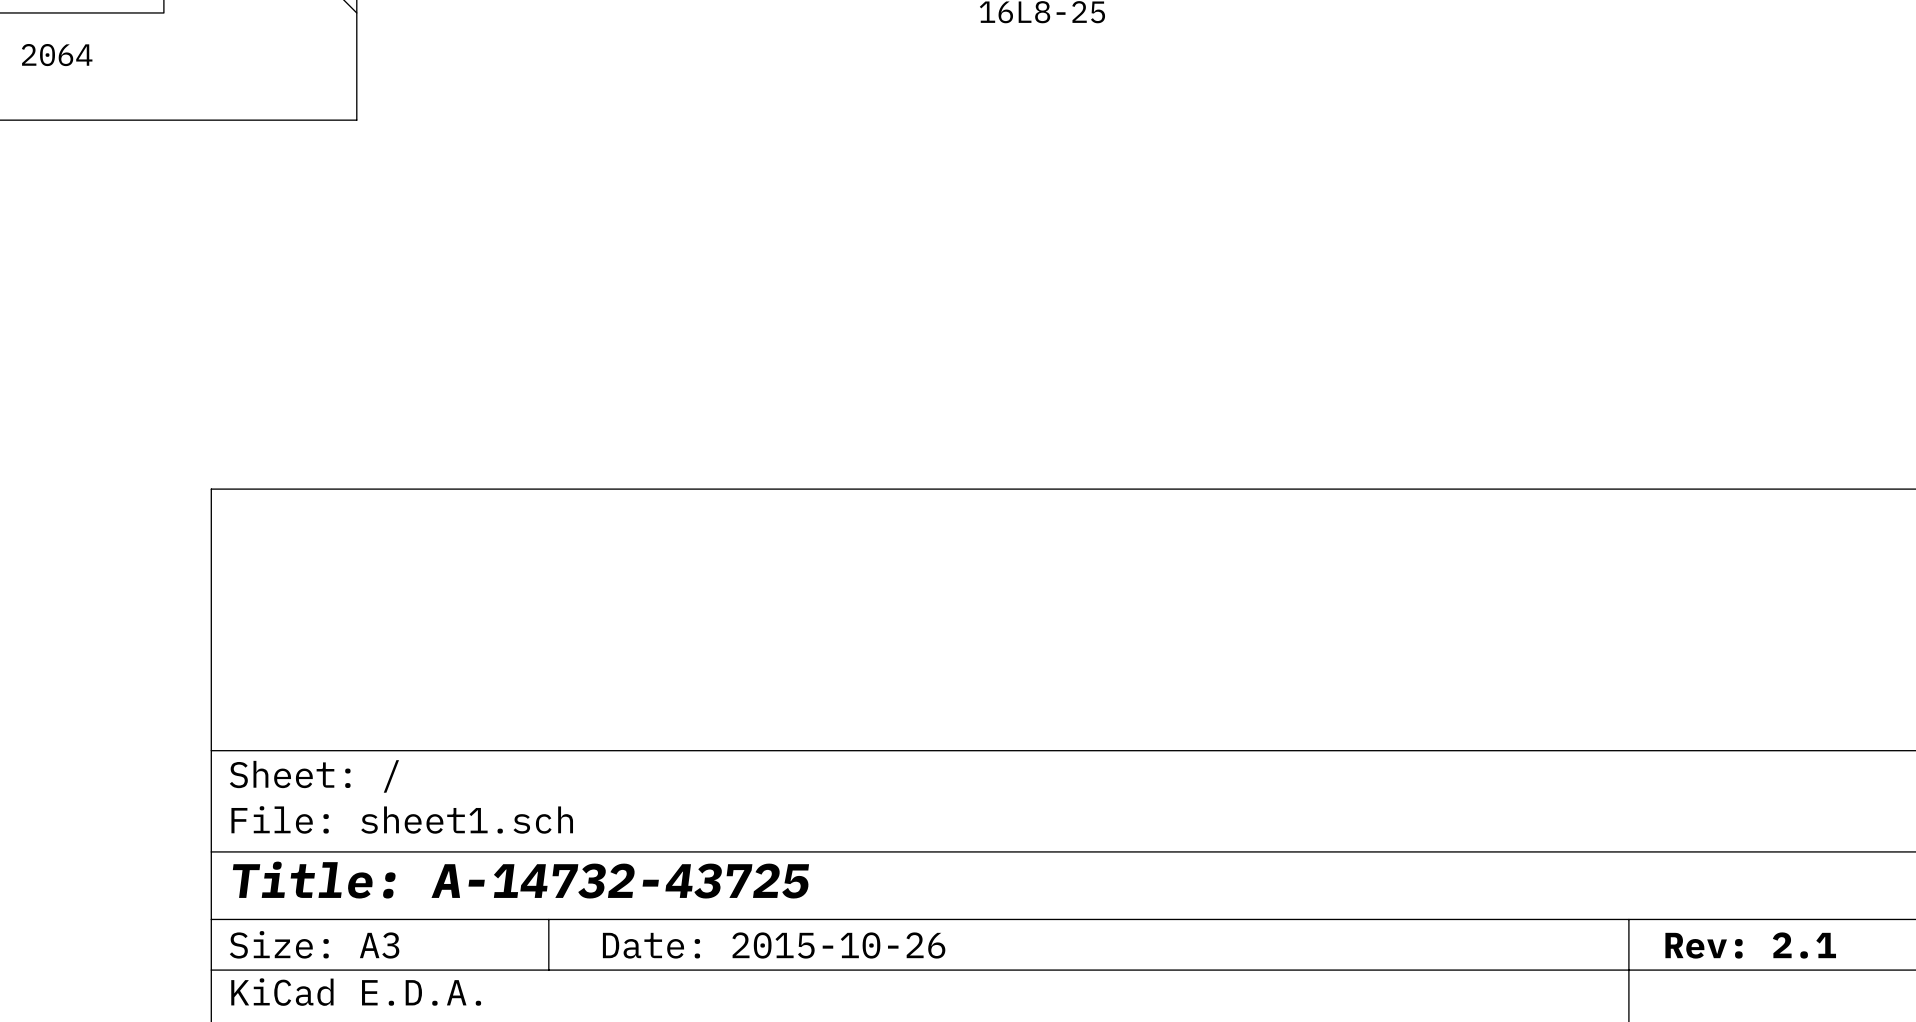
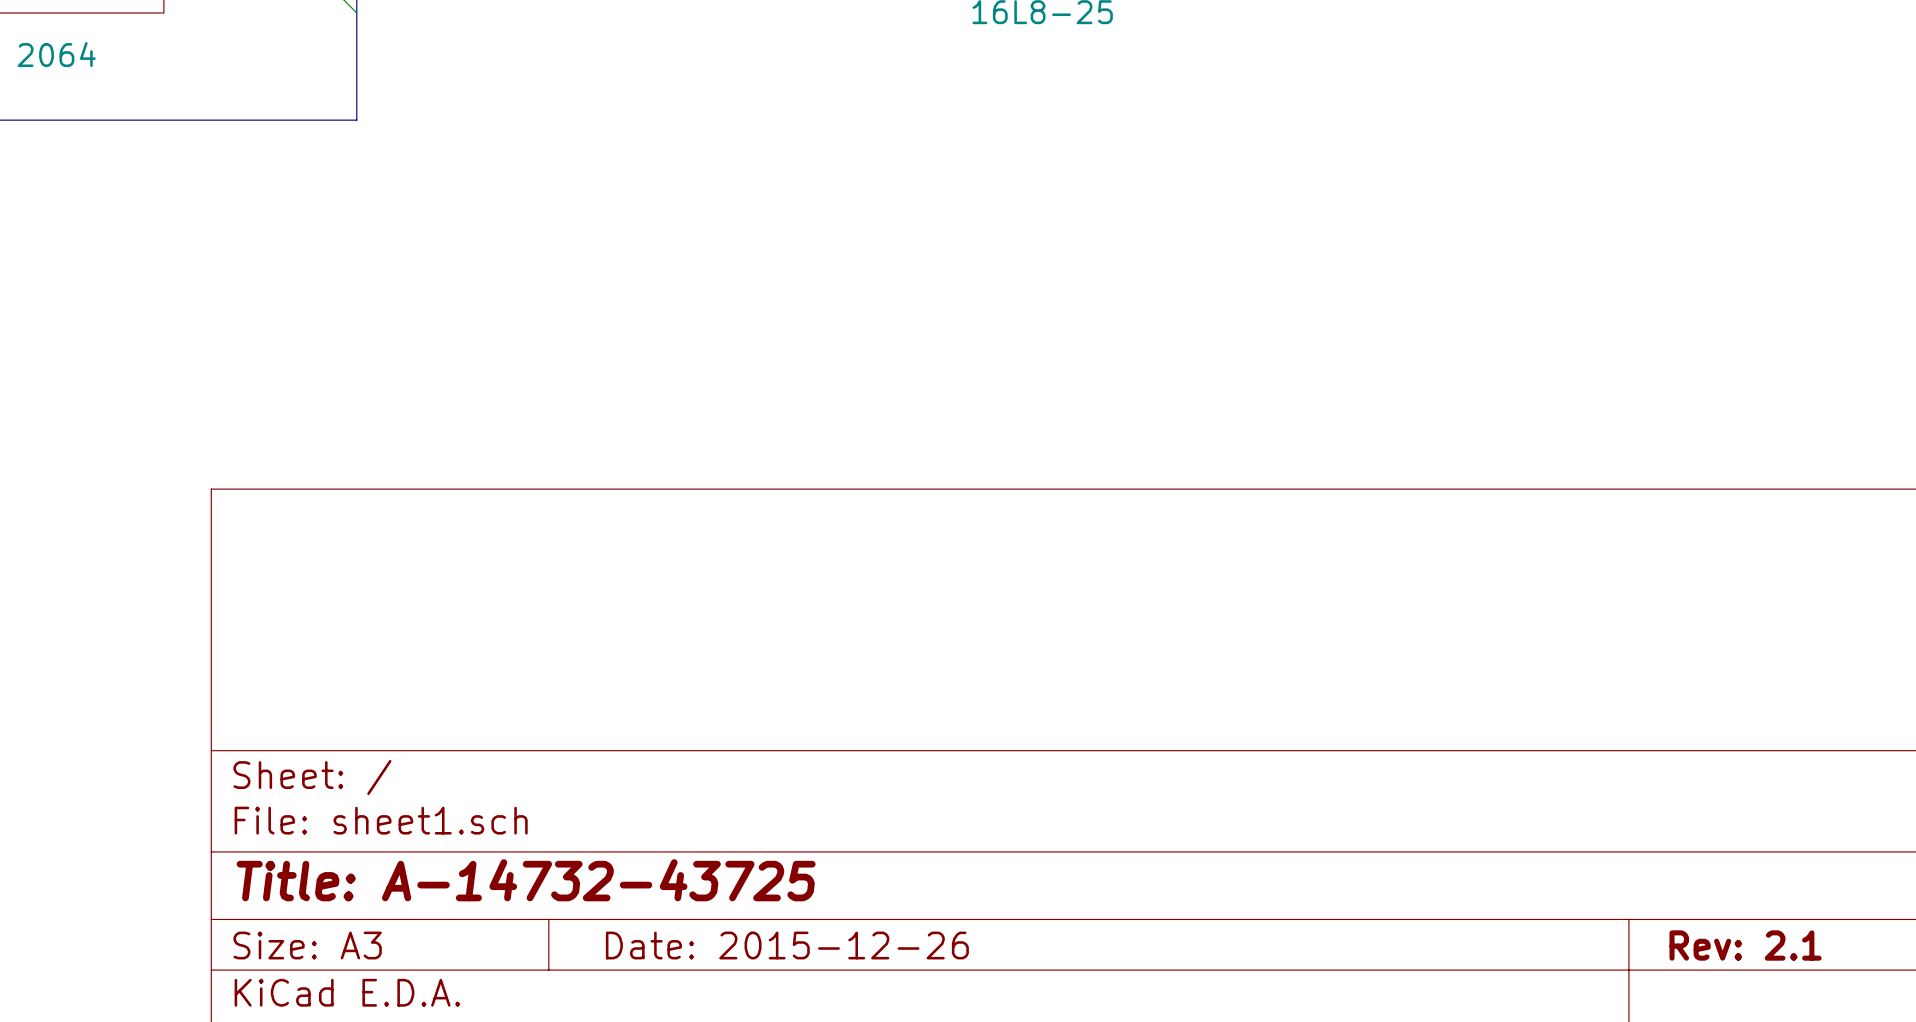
title block: Date: 2015-10-26 (774, 945) -> Date: 2015-12-26 (787, 945)

